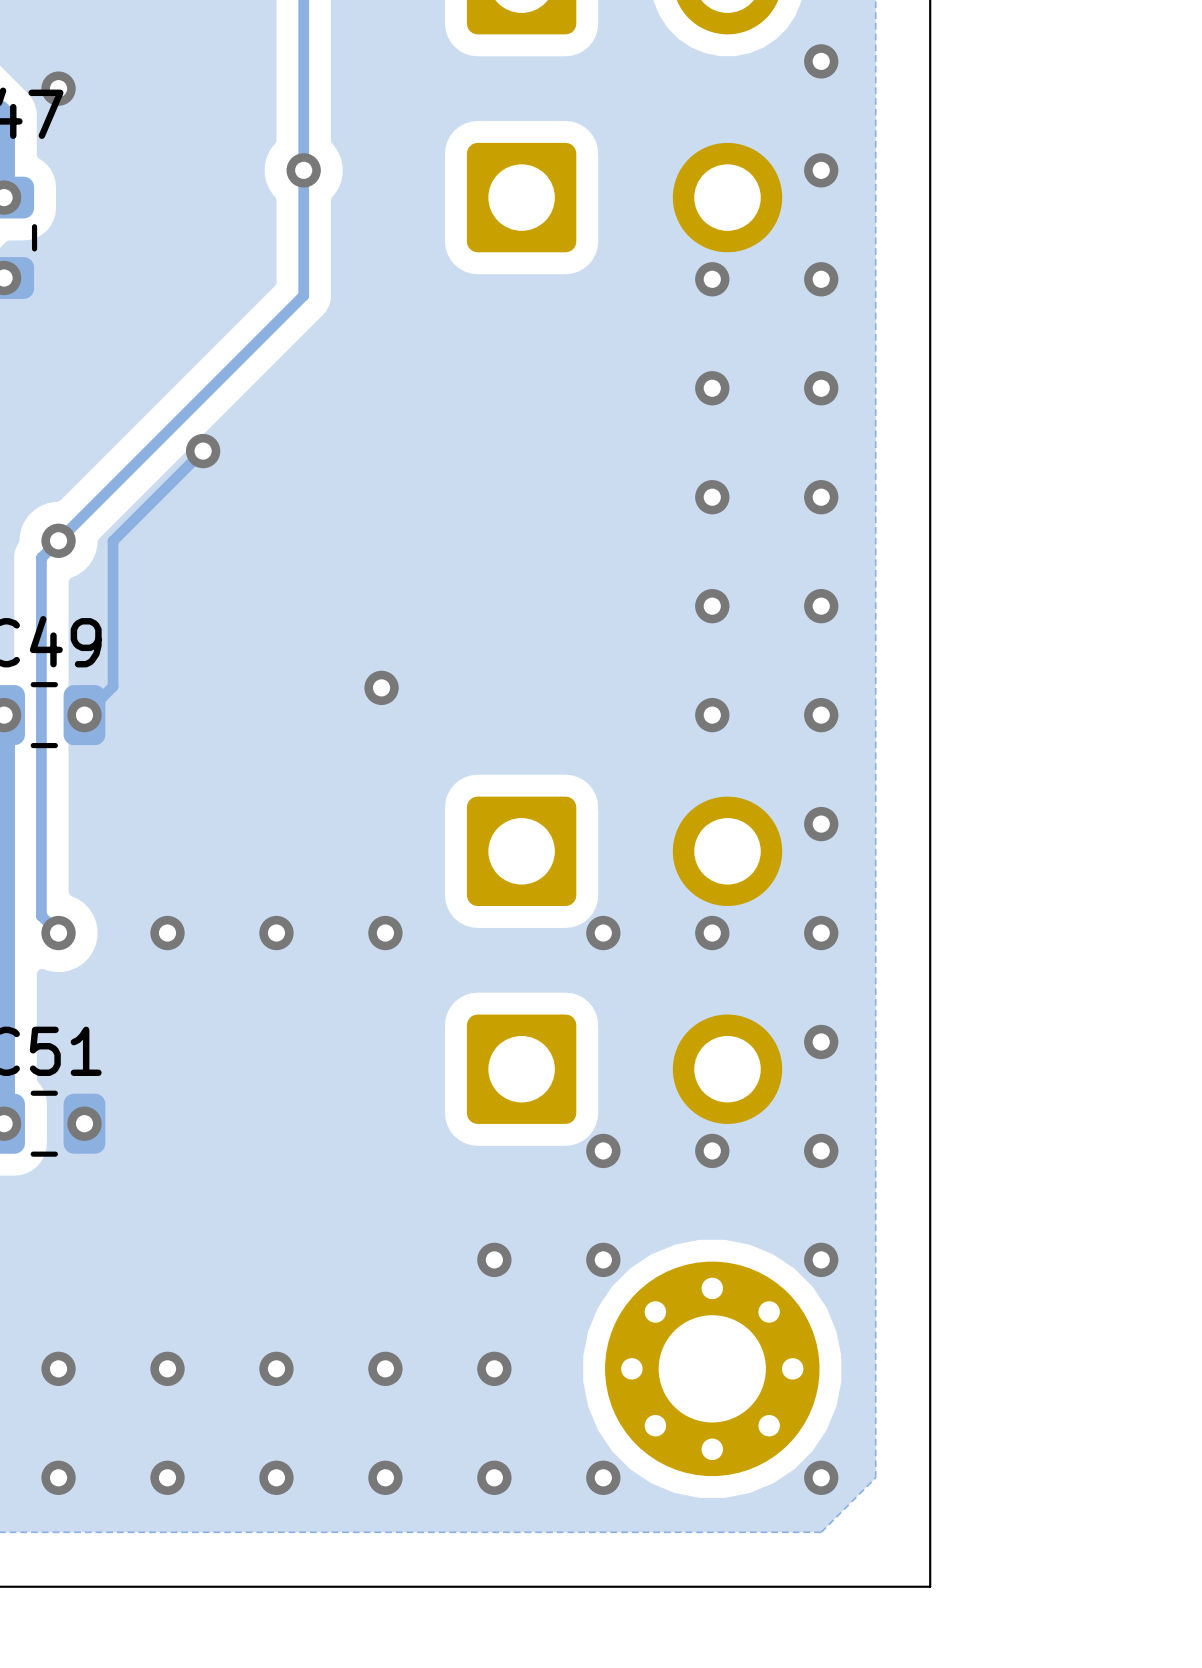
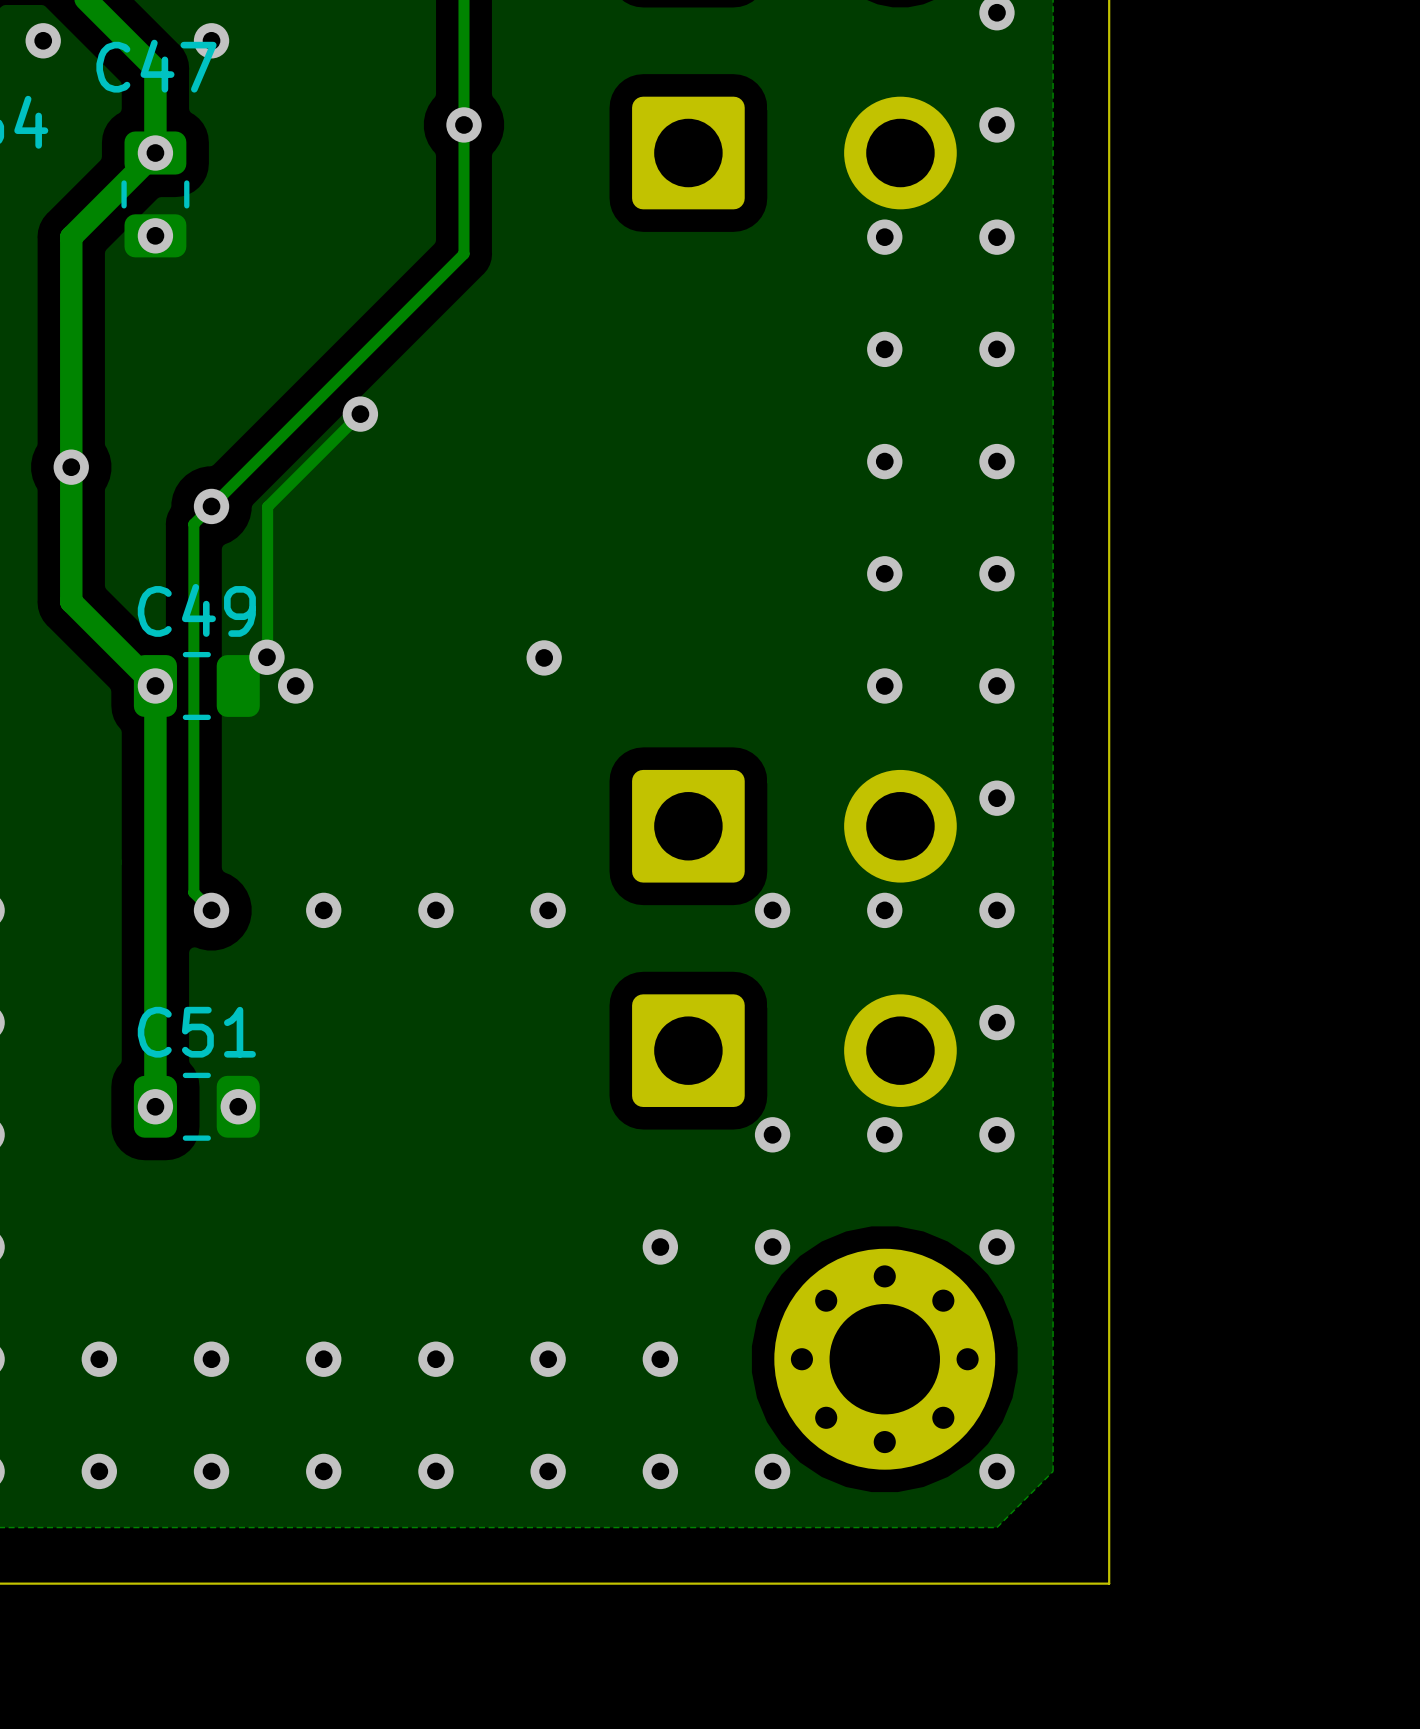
via position: (84, 715) -> (266, 657)
via: none -> (295, 685)

